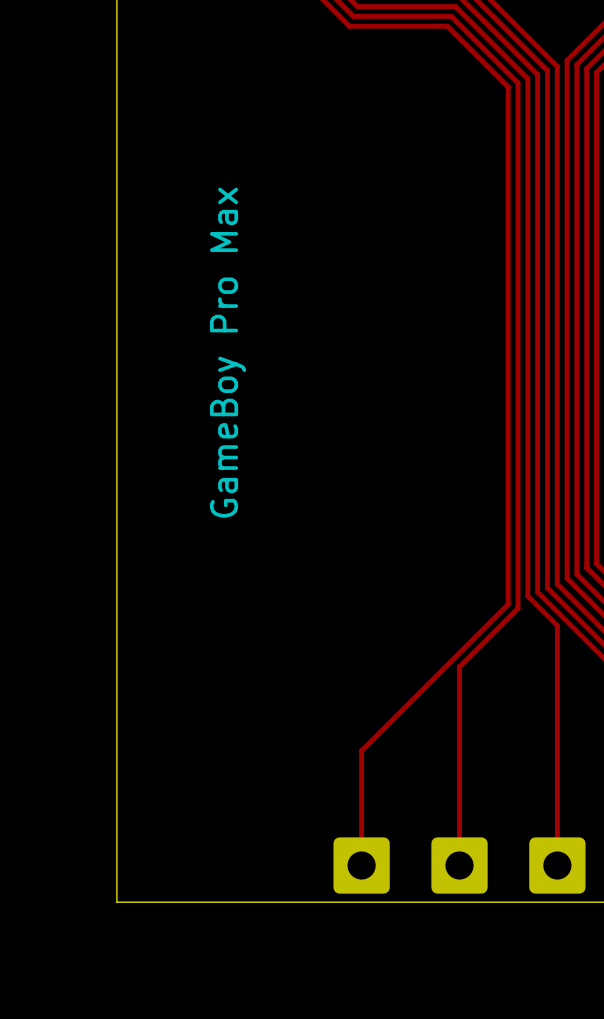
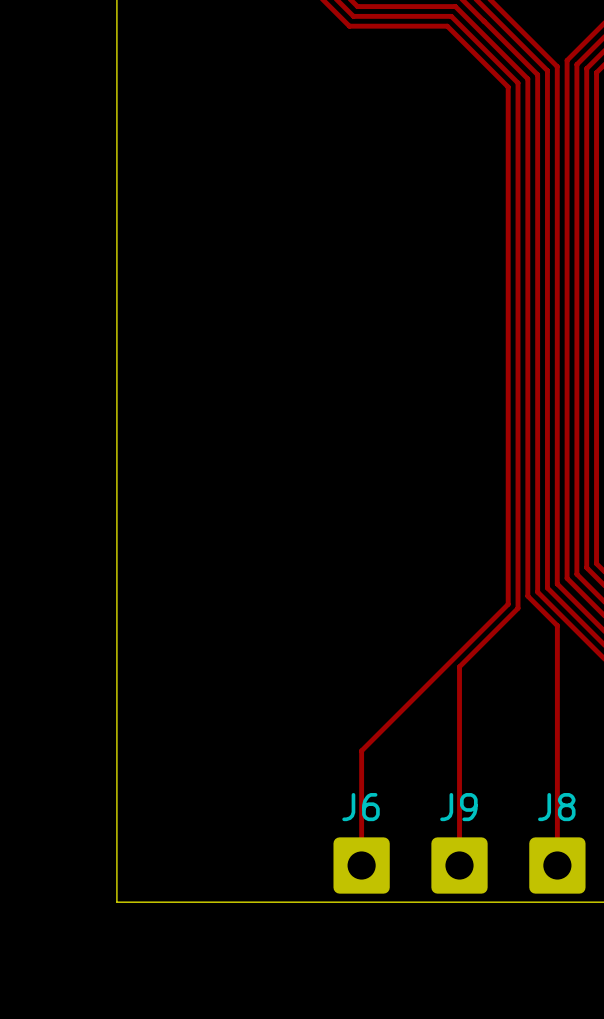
text: GameBoy Pro Max (228, 352) -> none
J6 name: none -> J6 (361, 807)
J9 name: none -> J9 (458, 807)
J8 name: none -> J8 (556, 807)

